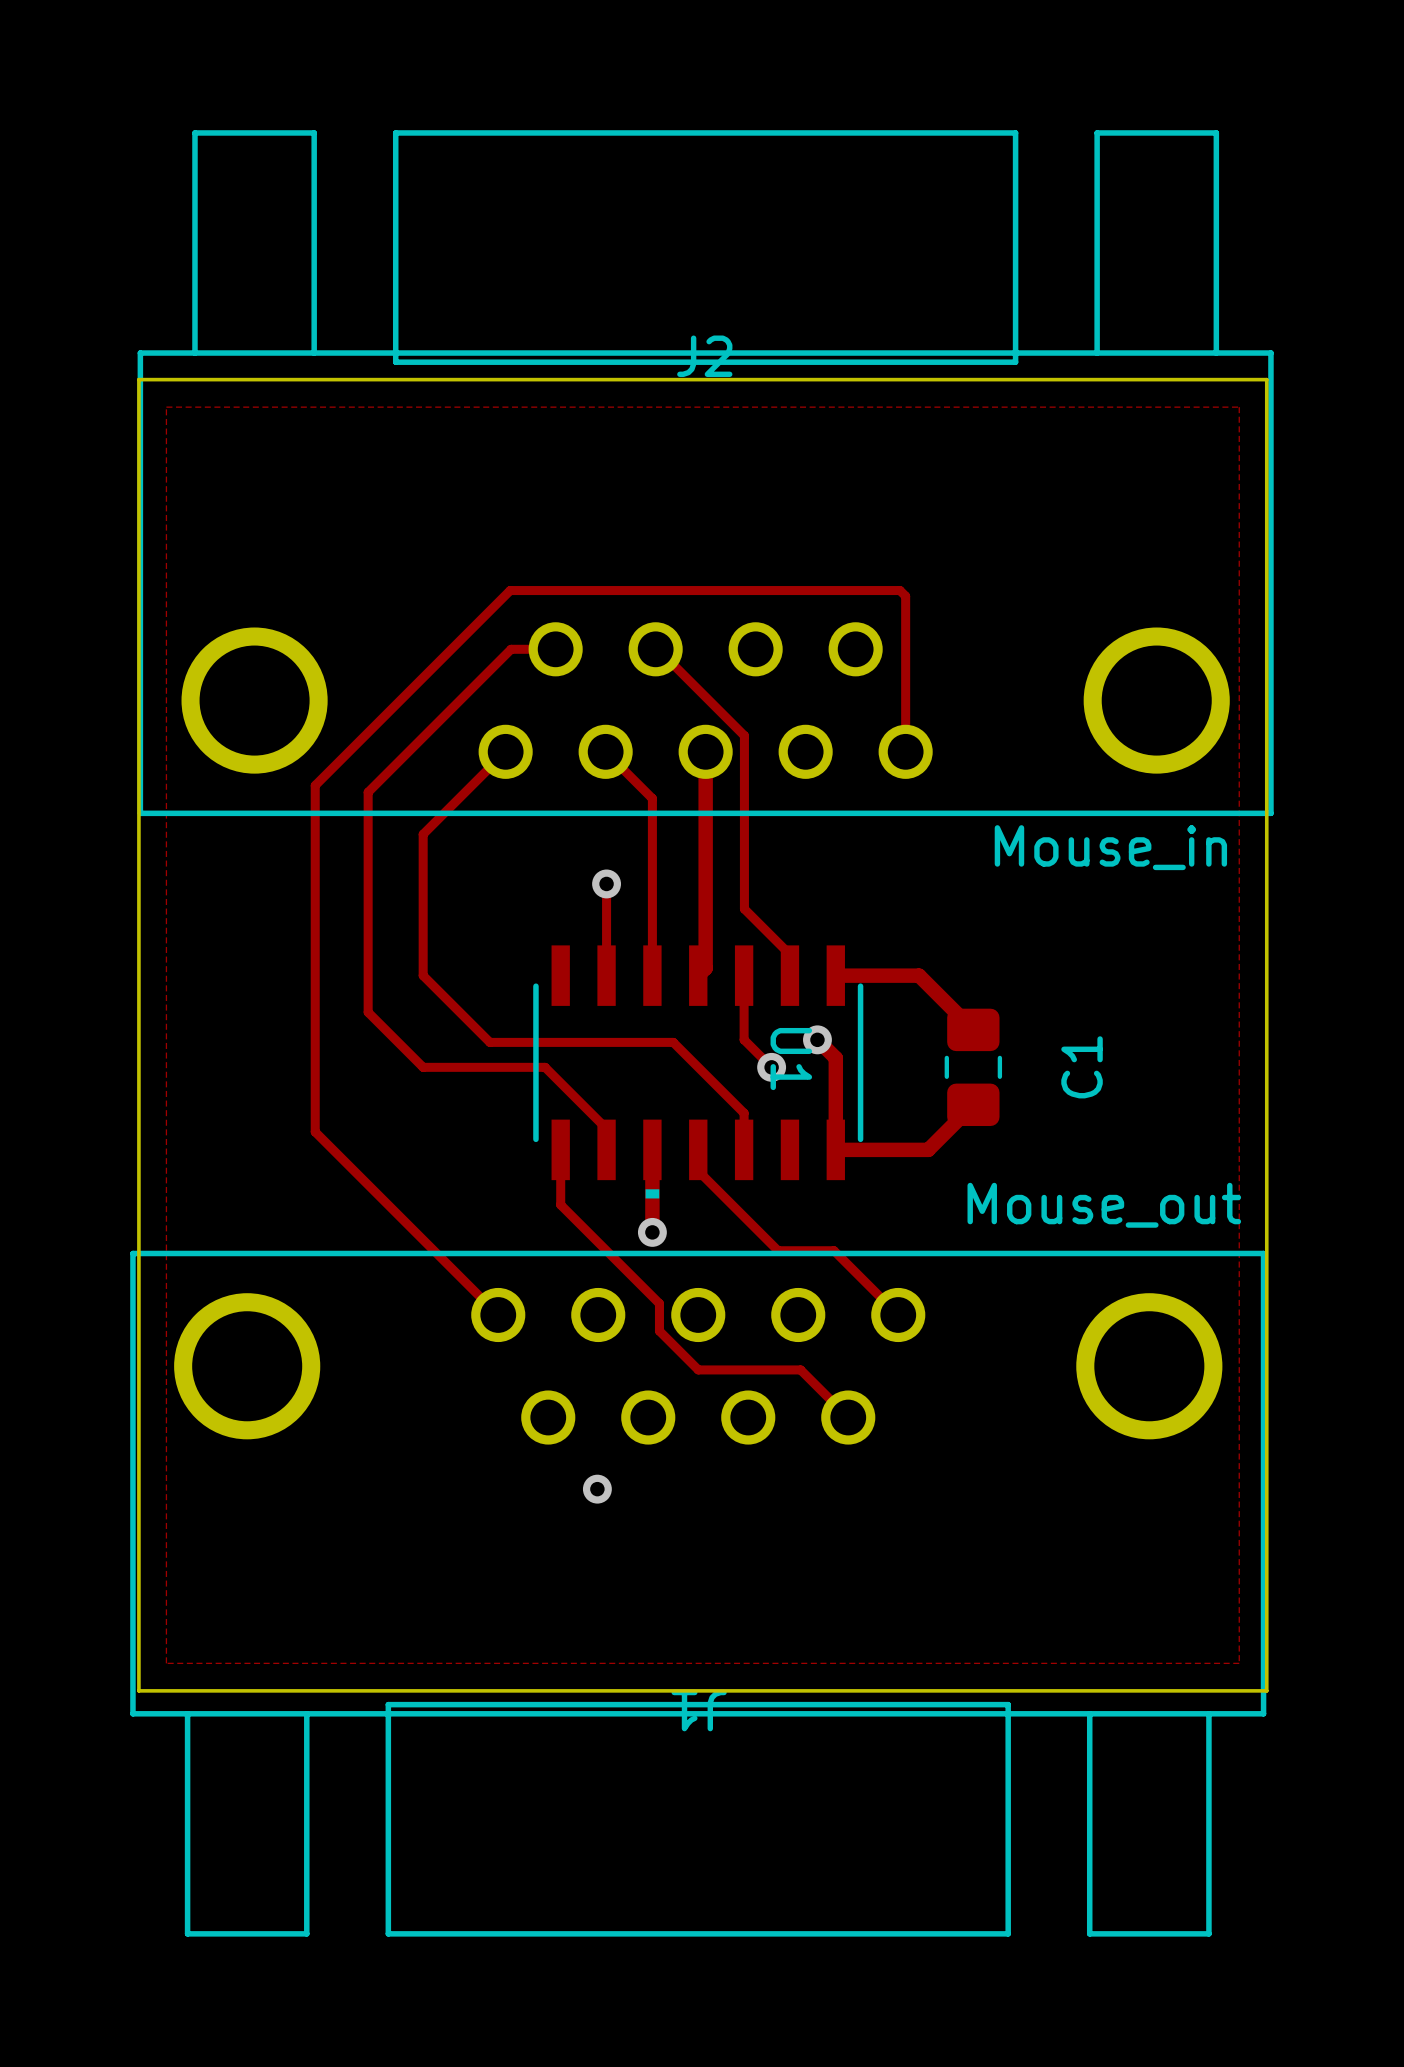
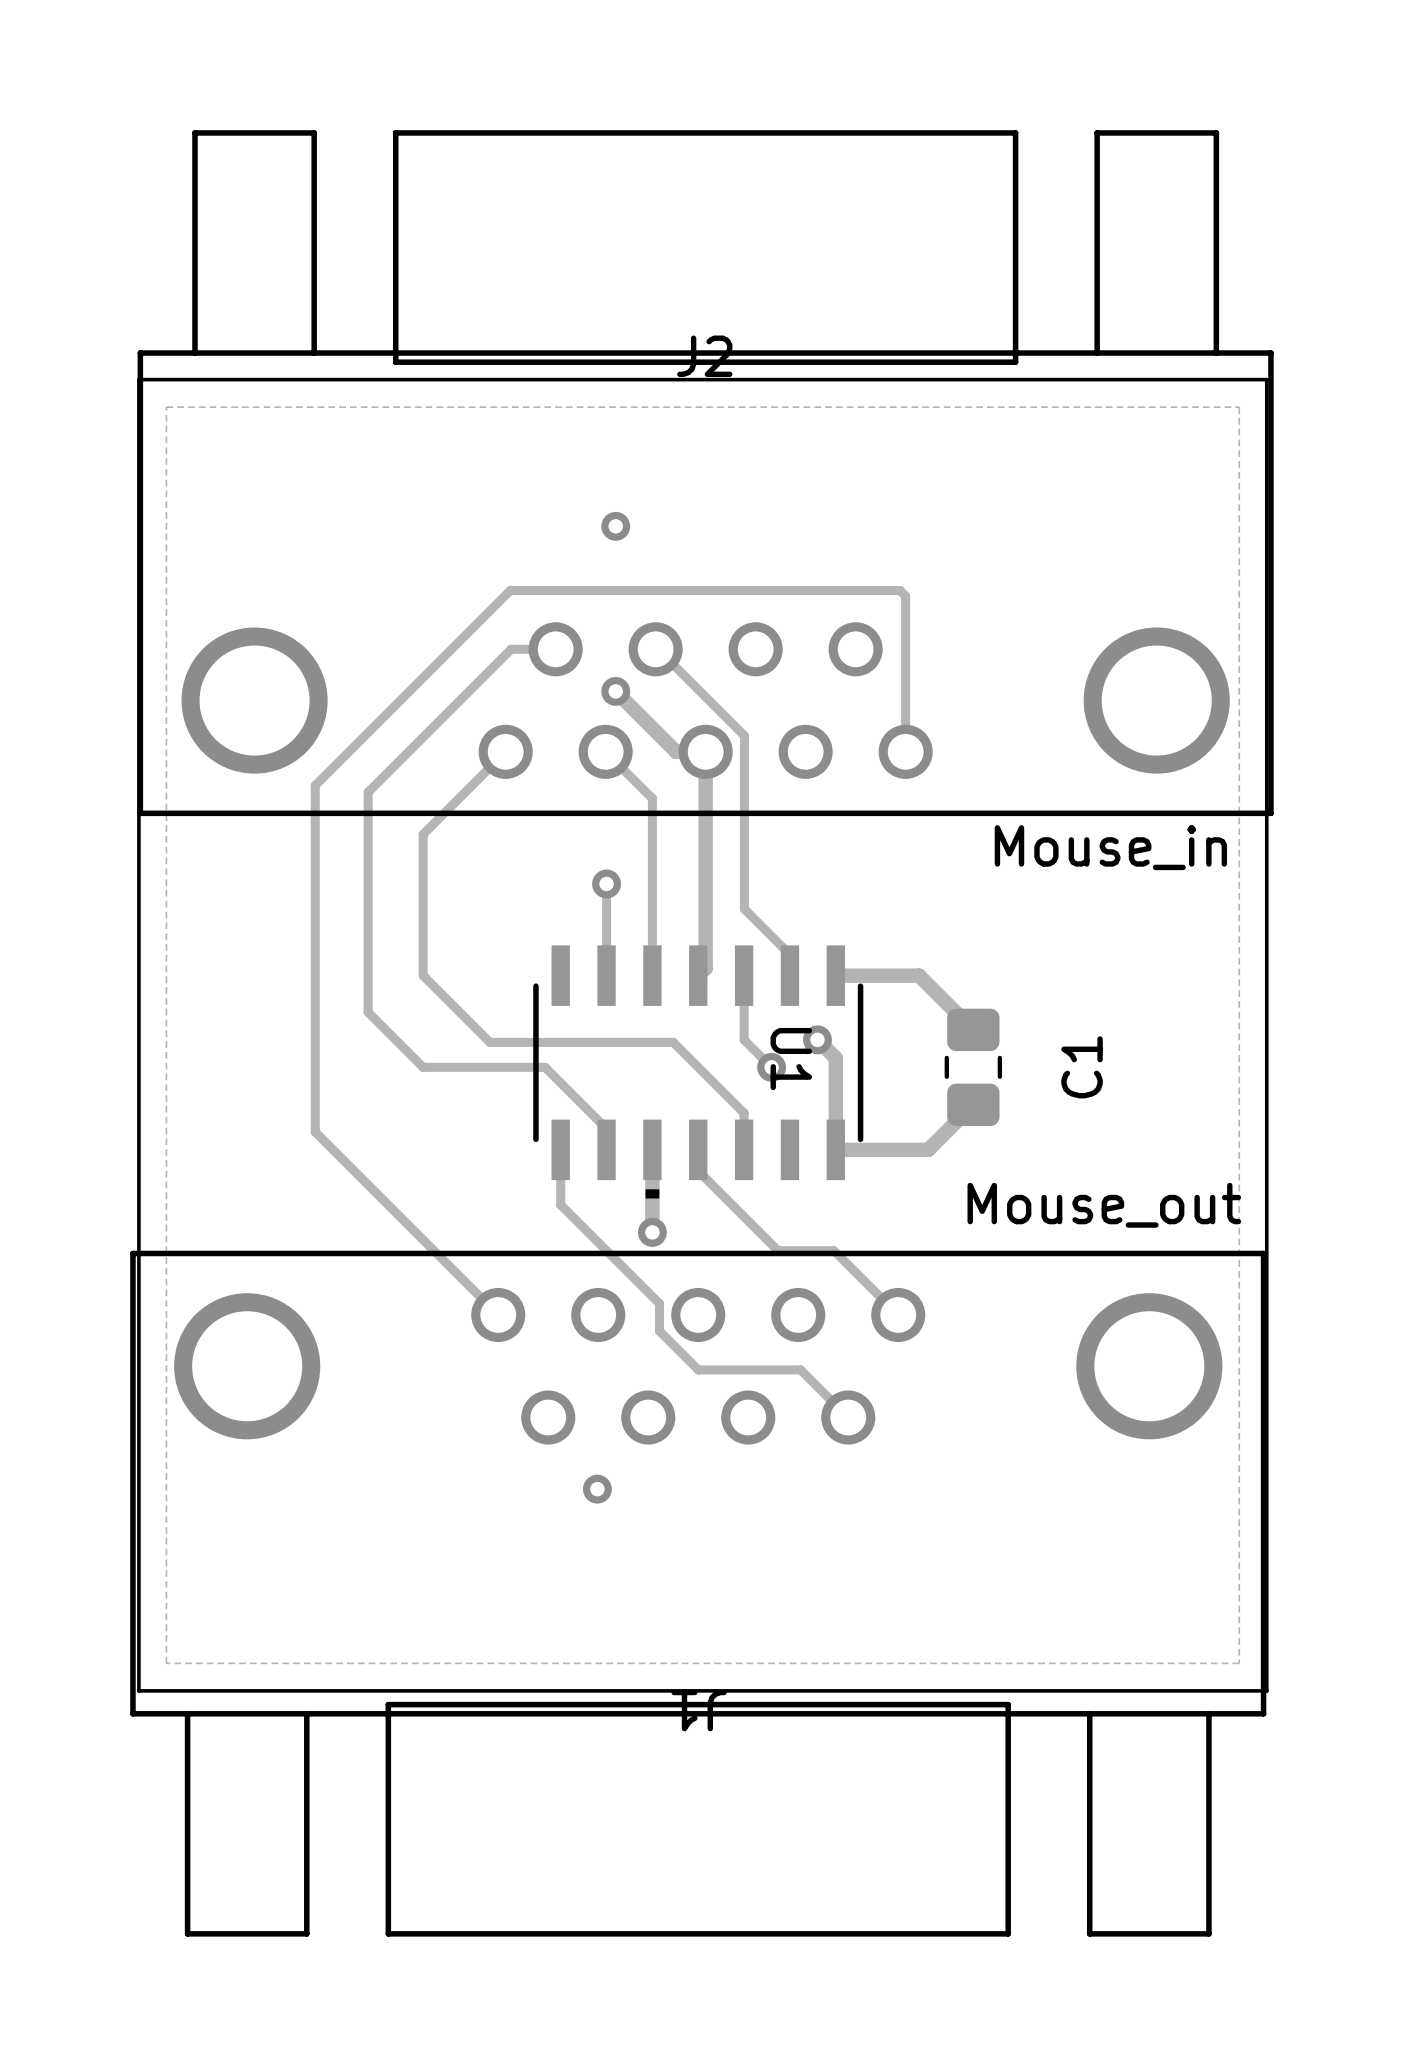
via: none -> (615, 526)
track: none -> (615, 691) (676, 751) (705, 751)
via: none -> (615, 691)

